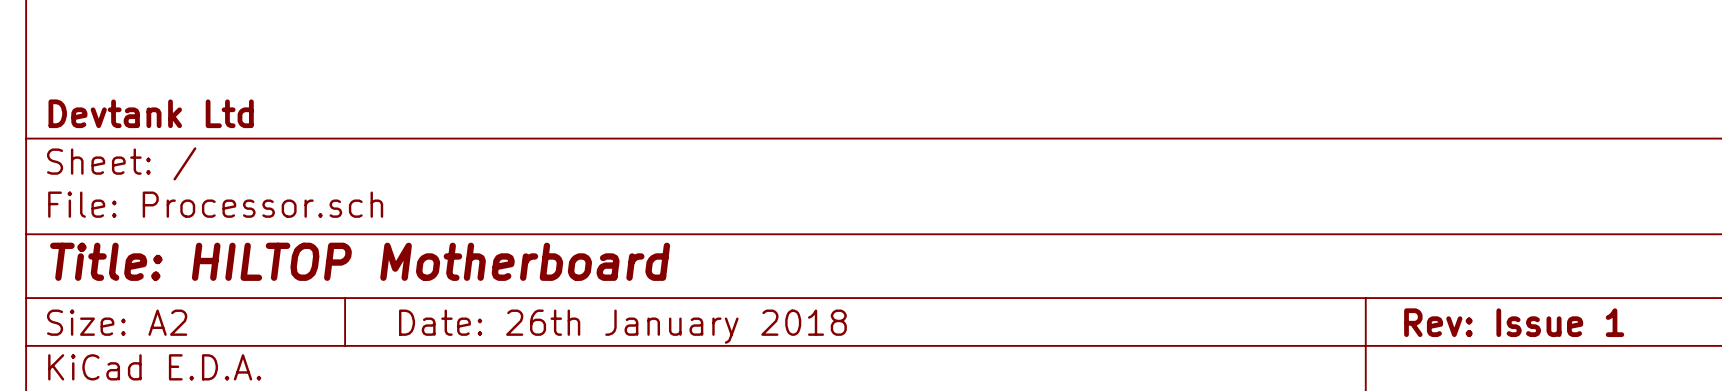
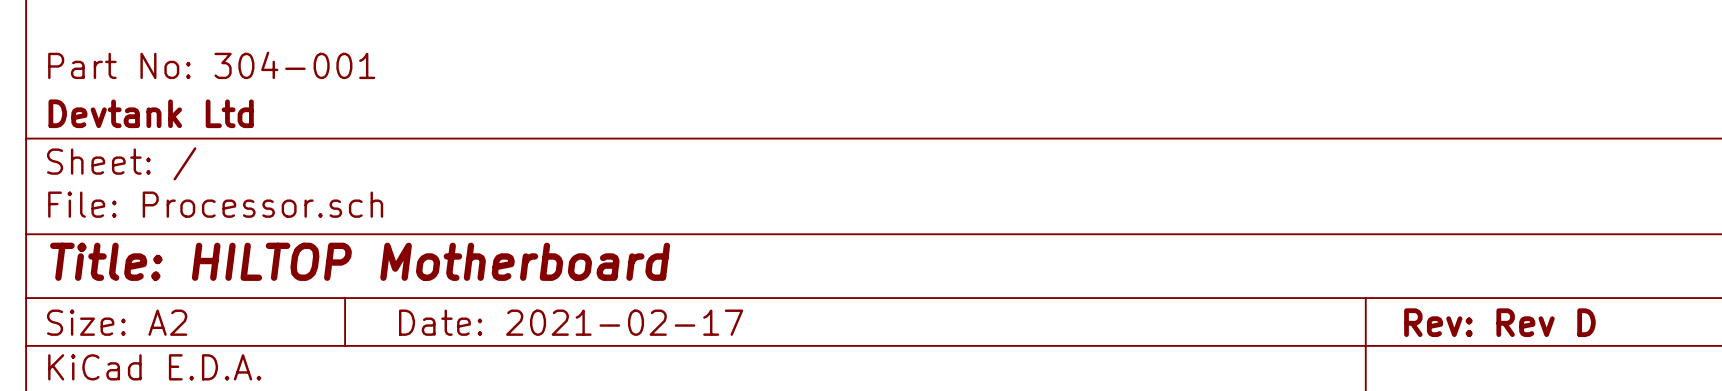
title block: none -> Part No: 304-001 (211, 65)
title block: Rev: Issue 1 (1514, 322) -> Rev: Rev D (1499, 322)
title block: Date: 26th January 2018 (622, 326) -> Date: 2021-02-17 (571, 322)

